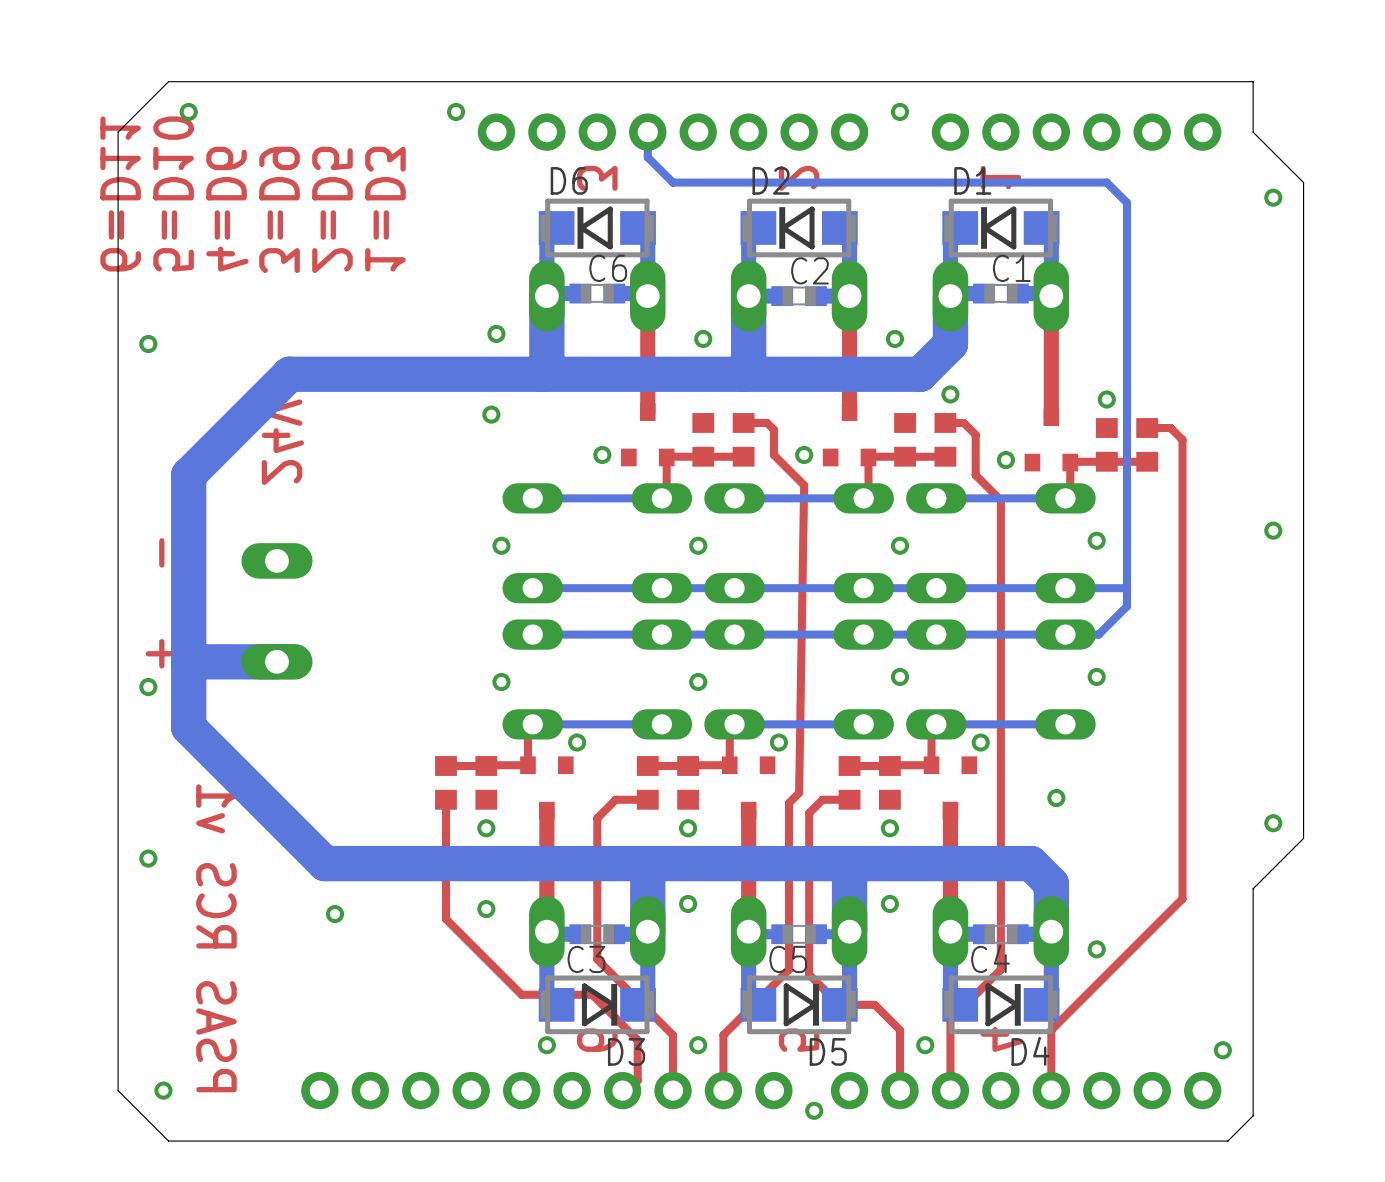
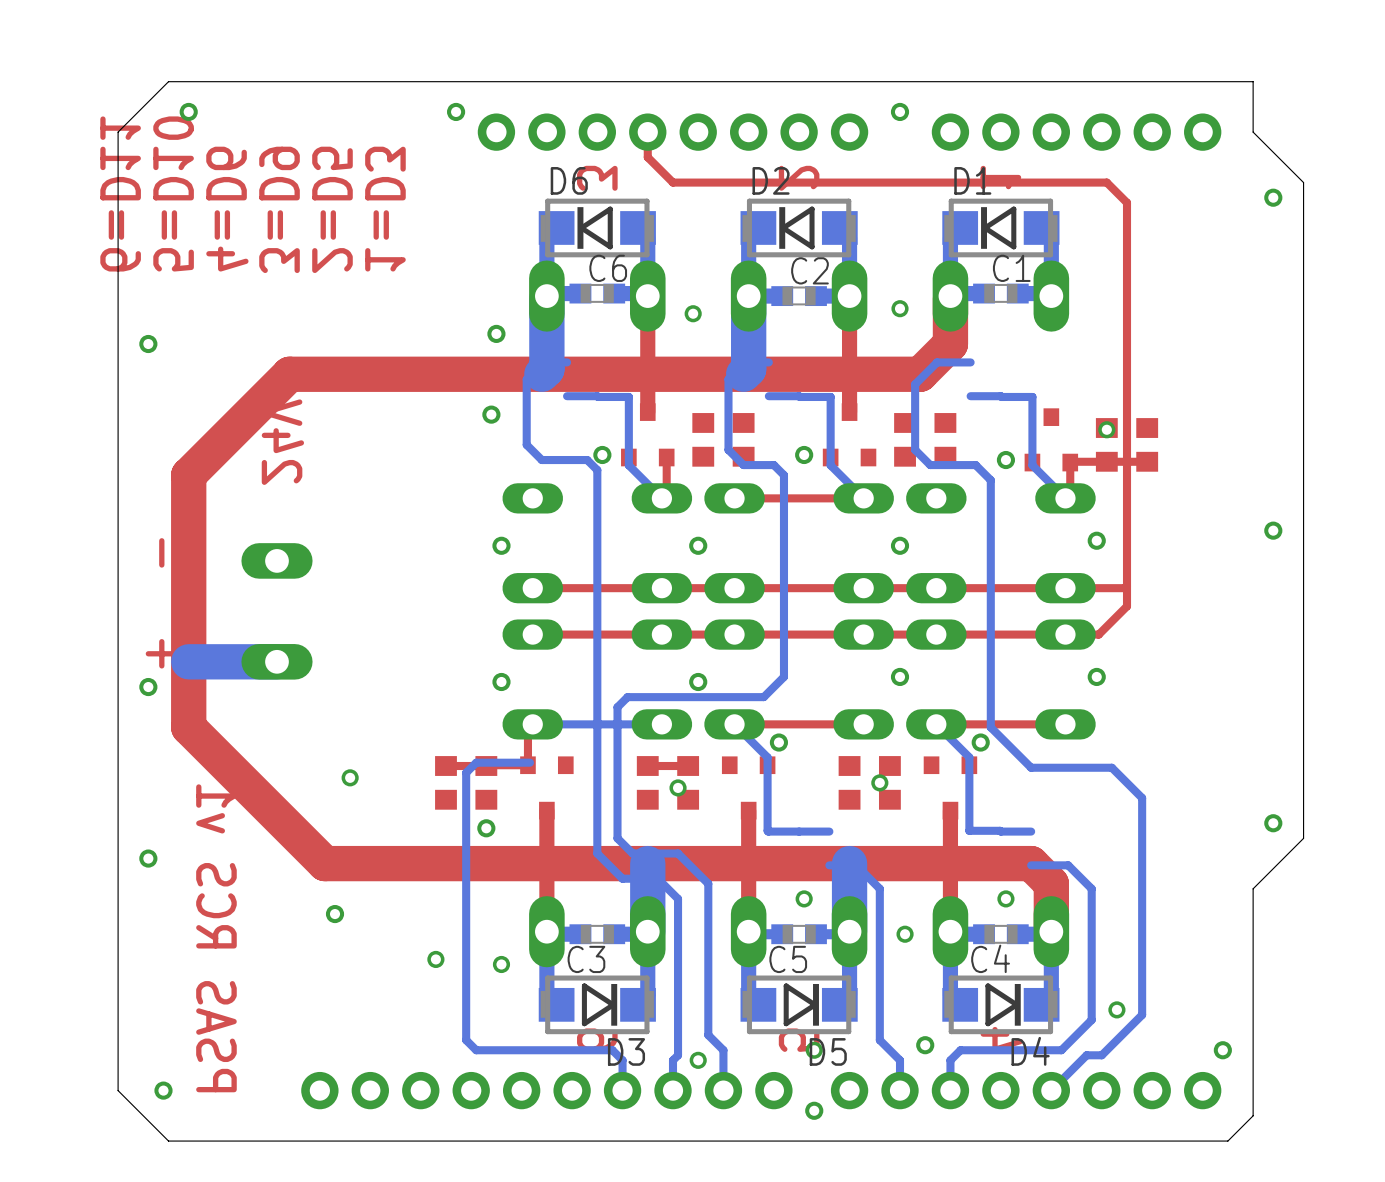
bottom track: (647, 132) (647, 157) (672, 182) (1106, 182) (1127, 202) (1127, 606) (1098, 634) (532, 634) -> none
top track: none -> (647, 132) (647, 157) (672, 182) (1106, 182) (1127, 202) (1127, 606) (1098, 634) (532, 634)
top track: none -> (950, 296) (950, 344) (920, 374) (289, 374) (188, 475) (188, 727) (324, 863) (1031, 863) (1051, 883) (1051, 931)
top track: (1051, 296) (1051, 417) -> none
bottom track: (950, 298) (950, 296) (950, 344) (920, 374) (289, 374) (188, 475) (188, 727) (324, 863) (1031, 863) (1051, 883) (1051, 931) -> none
via: none -> (900, 308)
via: none -> (693, 313)
via: (703, 338) -> none
via: (894, 338) -> none
bottom track: none -> (567, 362) (543, 362) (526, 379) (526, 444) (541, 460) (587, 460) (597, 470) (597, 853) (622, 878) (657, 878) (678, 898) (678, 1055) (672, 1060) (672, 1090)
bottom track: none -> (768, 362) (745, 362) (728, 379) (728, 449) (743, 465) (773, 465) (783, 475) (783, 676) (763, 697) (627, 697) (617, 707) (617, 838) (632, 853) (678, 853) (708, 883) (708, 1035) (723, 1050) (723, 1090)
bottom track: none -> (970, 362) (937, 362) (915, 384) (915, 449) (930, 465) (975, 465) (990, 480) (990, 727) (1031, 767) (1111, 767) (1142, 798) (1142, 1014) (1101, 1055) (1086, 1055) (1051, 1090)
via: (950, 394) -> none
via: (1106, 399) -> none
top track: (743, 422) (767, 422) (773, 429) (773, 454) (804, 485) (799, 792) (789, 803) (789, 969) (723, 1035) (723, 1090) -> none
top track: (945, 422) (963, 422) (975, 434) (975, 475) (1000, 500) (1000, 969) (950, 1019) (950, 1090) -> none
top track: (1147, 428) (1170, 428) (1182, 439) (1182, 898) (1051, 1030) (1051, 1090) -> none
via: none -> (1106, 429)
top track: (743, 456) (669, 456) (666, 460) -> none
top track: (945, 456) (940, 460) (937, 456) (869, 456) (868, 493) (863, 498) -> (734, 498) (863, 498)
bottom track: (661, 498) (532, 498) -> (661, 498) (628, 465) (628, 396) (567, 396)
bottom track: (863, 498) (734, 498) -> (863, 498) (830, 465) (830, 396) (768, 396)
bottom track: (1065, 498) (936, 498) -> (1065, 498) (1032, 465) (1032, 396) (970, 396)
bottom track: (1127, 586) (1124, 588) (532, 588) -> none
top track: none -> (1127, 586) (1124, 588) (532, 588)
top track: (734, 724) (729, 734) (729, 765) (688, 766) -> (734, 724) (863, 724)
bottom track: (863, 724) (734, 724) -> (829, 831) (767, 830) (767, 757) (734, 724)
top track: (936, 724) (931, 734) (931, 765) (897, 765) (894, 767) (889, 767) (889, 766) (849, 766) -> (936, 724) (1065, 724)
bottom track: (1065, 724) (936, 724) -> (1031, 831) (969, 830) (969, 757) (936, 724)
via: (577, 742) -> none
bottom track: none -> (530, 762) (476, 762) (466, 772) (466, 1040) (476, 1050) (612, 1050) (622, 1060) (622, 1090)
via: none -> (350, 777)
via: none -> (879, 782)
via: none -> (678, 787)
via: (1056, 798) -> none
top track: (445, 799) (445, 919) (521, 994) (592, 994) (637, 1040) (637, 1080) (622, 1090) -> none
top track: (647, 799) (615, 799) (597, 818) (597, 959) (672, 1035) (672, 1090) -> none
top track: (849, 799) (822, 799) (809, 813) (809, 974) (839, 1004) (874, 1004) (900, 1030) (900, 1090) -> none
via: (688, 828) -> none
via: (889, 828) -> none
bottom track: none -> (829, 865) (856, 865) (879, 888) (879, 1040) (900, 1060) (900, 1090)
bottom track: none -> (1031, 865) (1068, 865) (1091, 888) (1091, 1019) (1061, 1050) (960, 1050) (950, 1060) (950, 1090)
via: none -> (804, 898)
via: none -> (1005, 898)
via: (688, 903) -> none
via: (889, 903) -> none
via: (486, 909) -> none
via: none -> (905, 934)
via: (1096, 949) -> none
via: none -> (435, 959)
via: none -> (501, 964)
via: none -> (1116, 1009)
via: (546, 1045) -> none
via position: (698, 1045) -> (698, 1060)
via: none -> (814, 1050)

